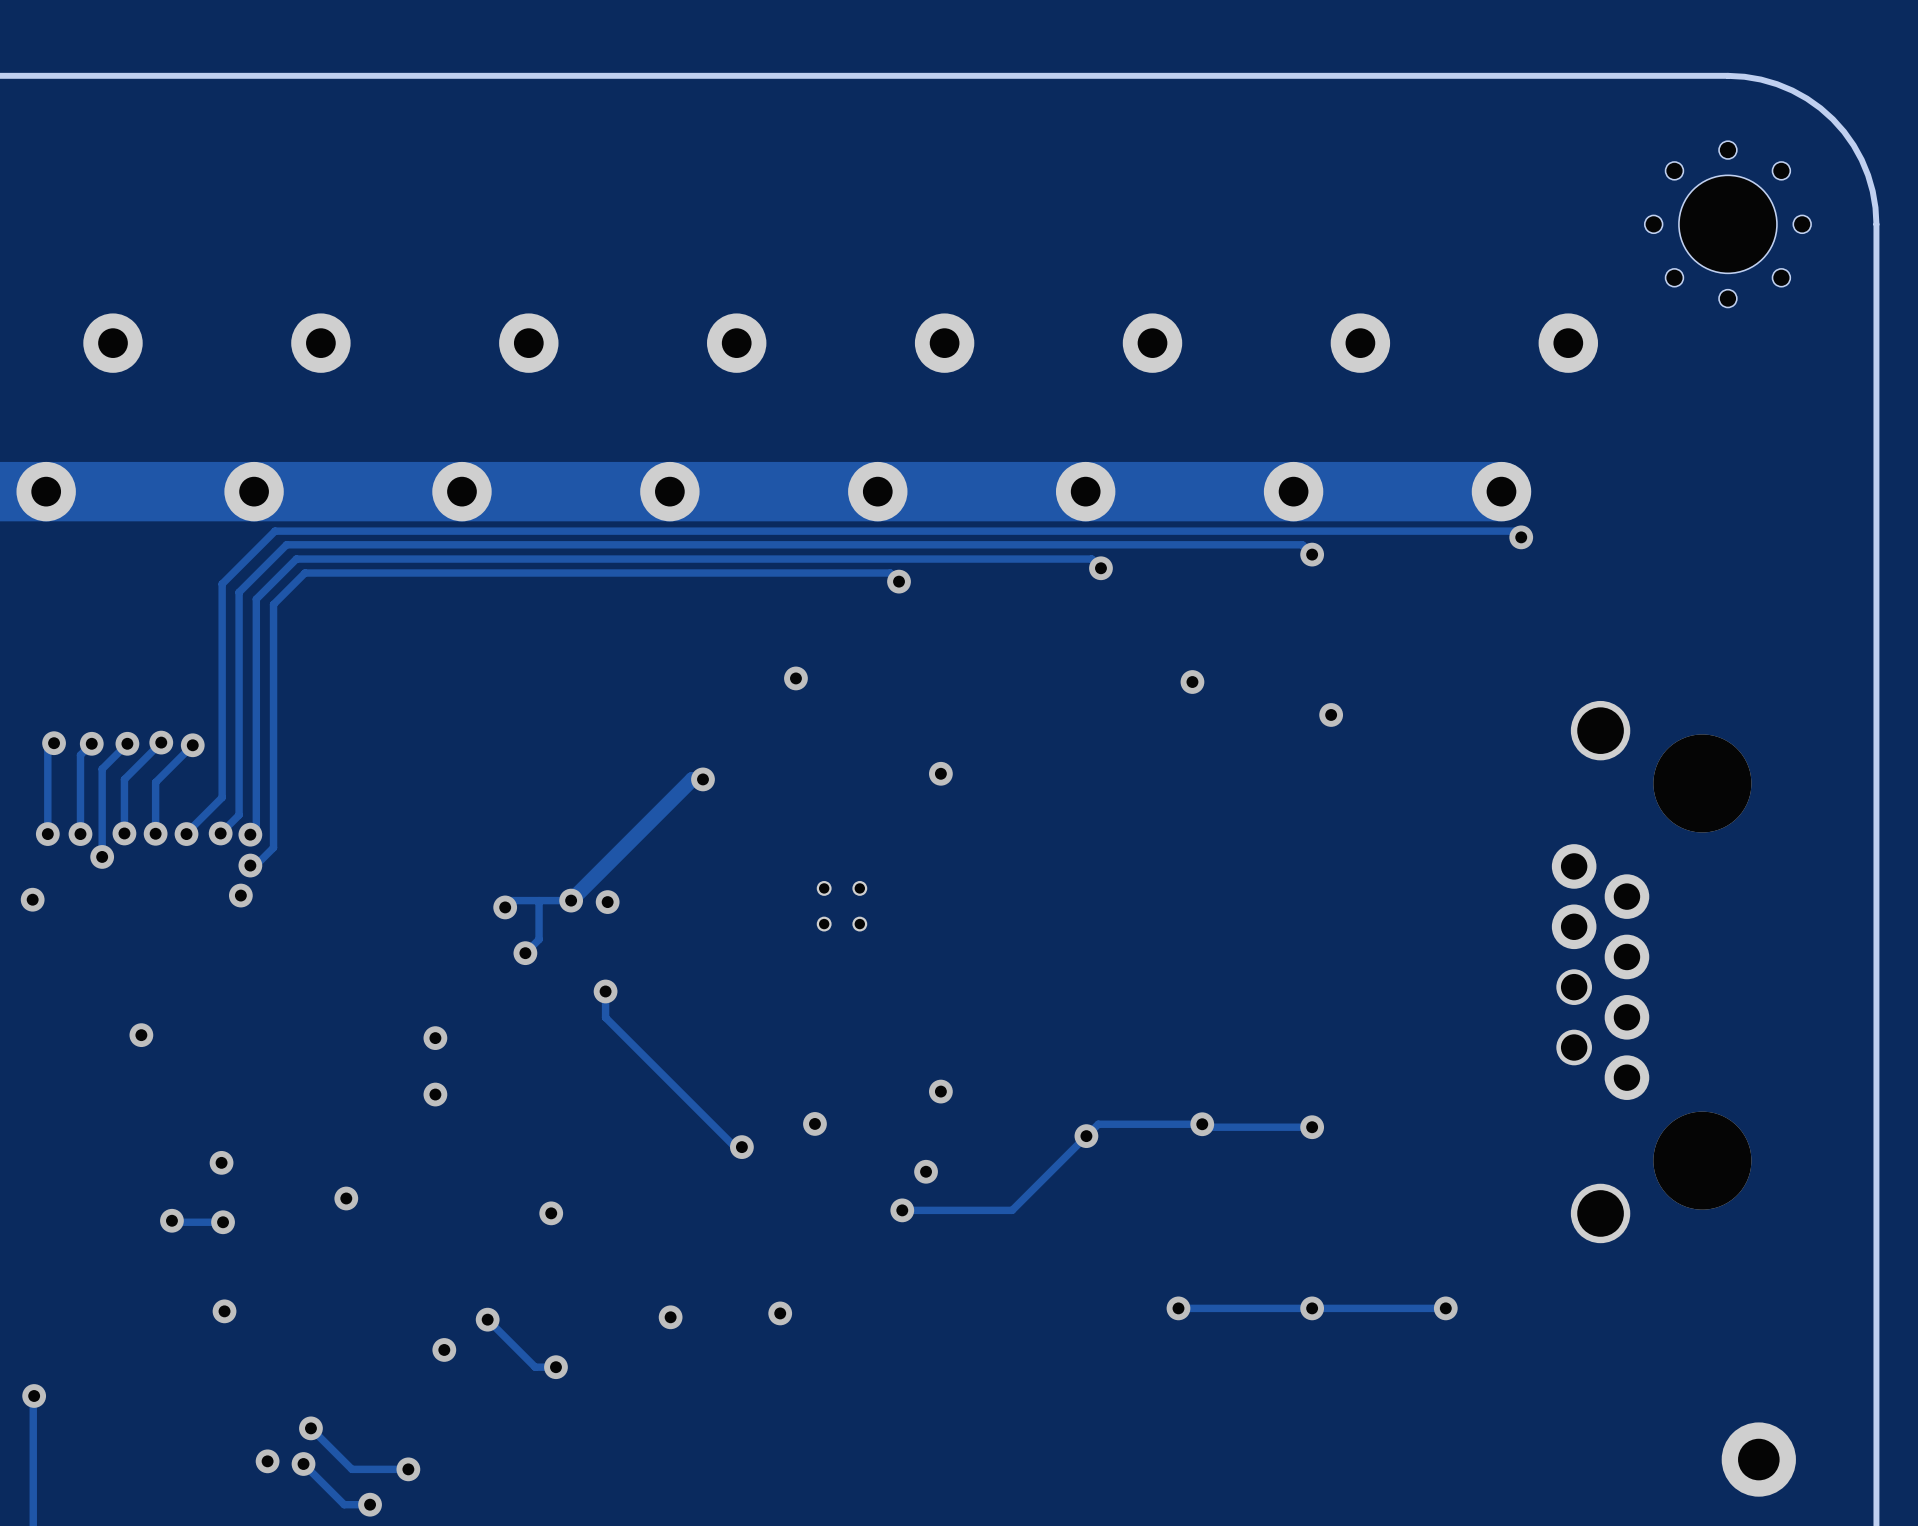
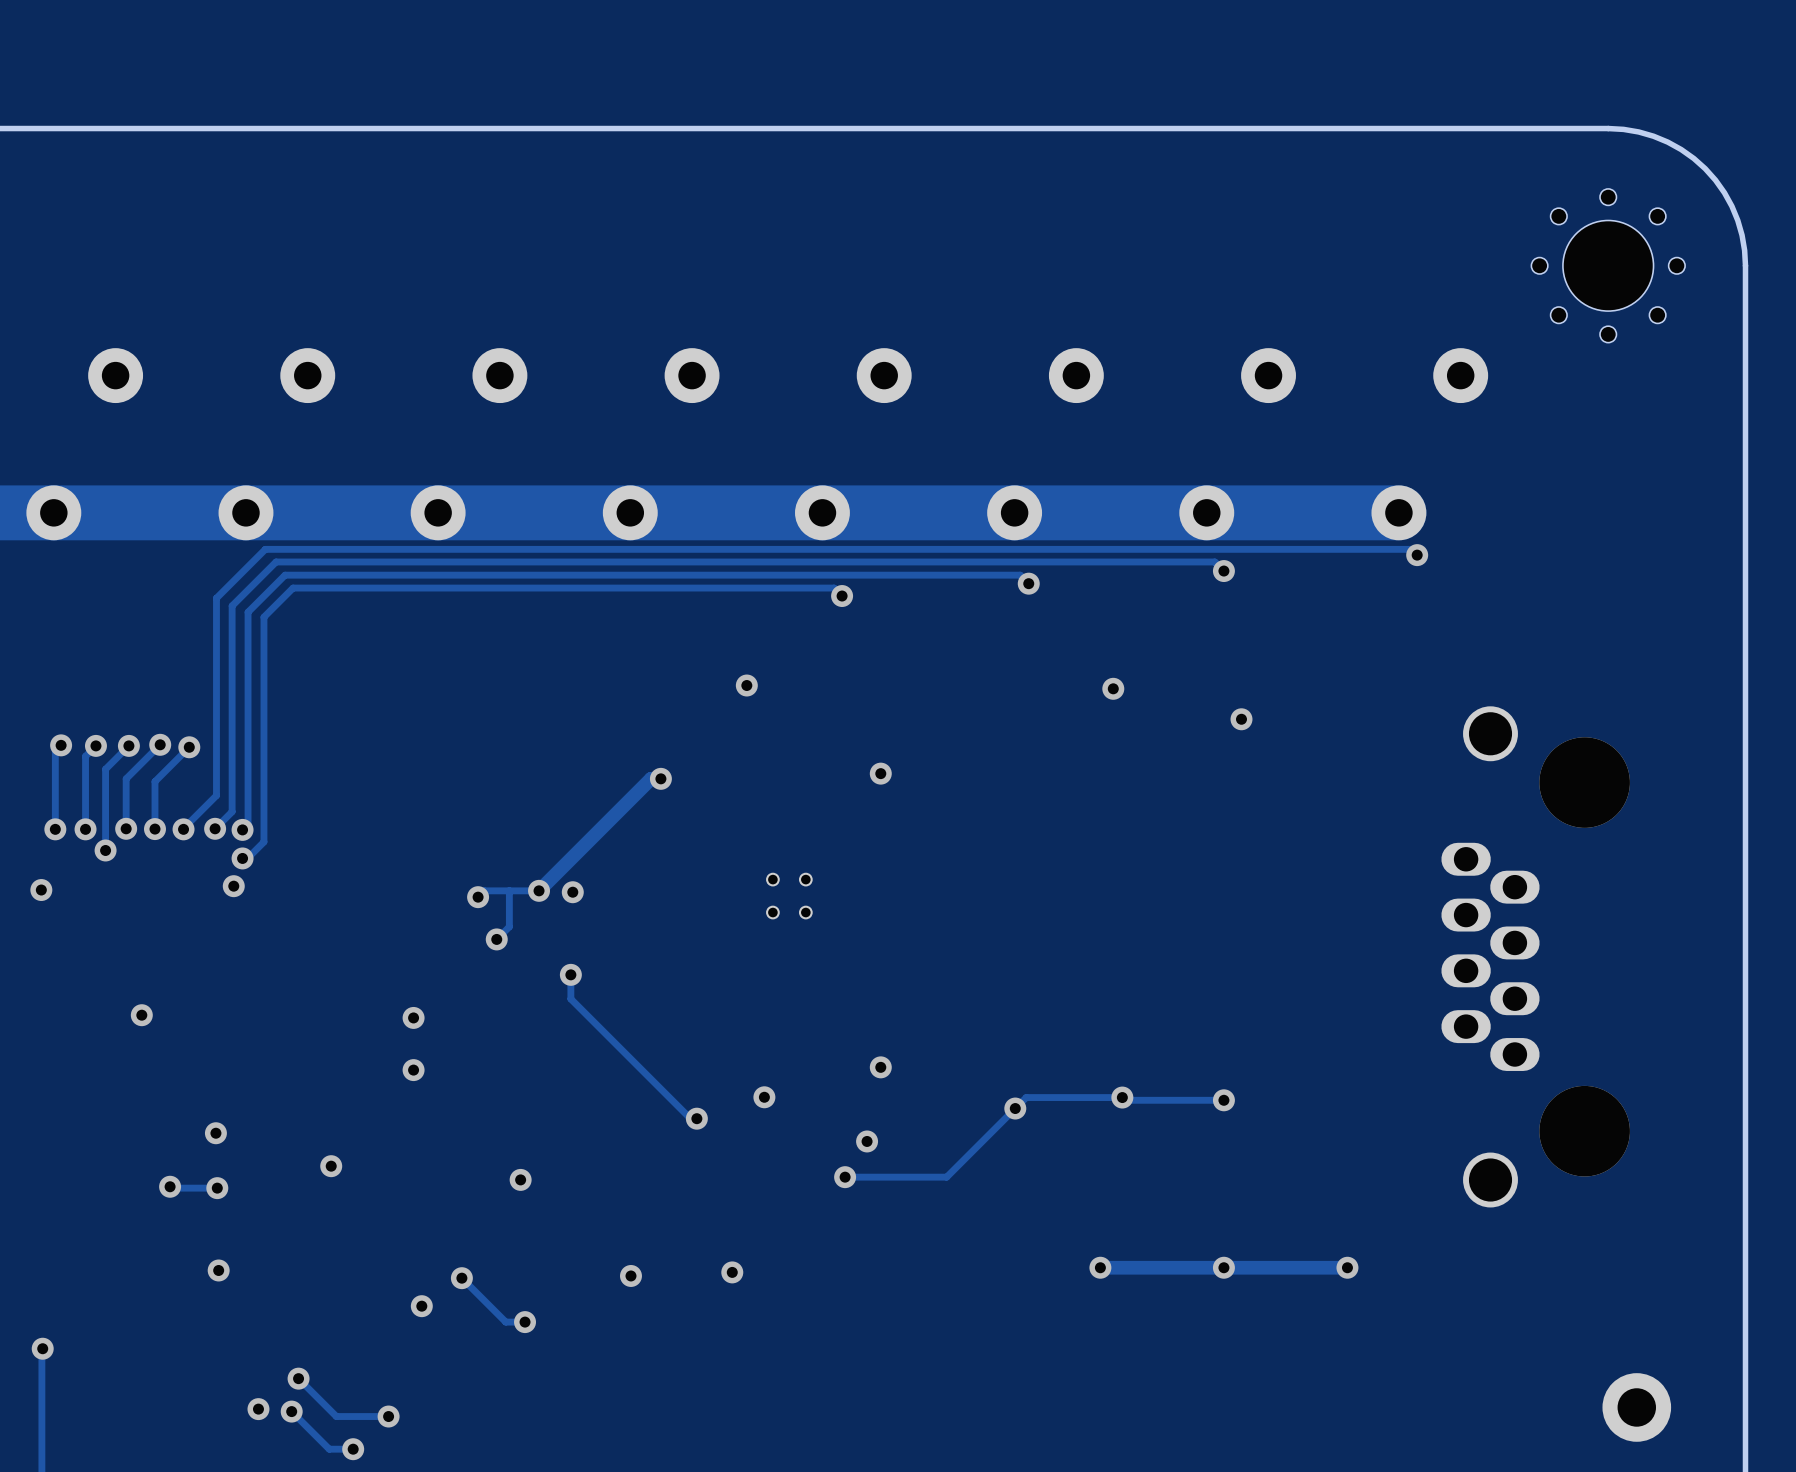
part footprint: [1551, 700, 1752, 1244] -> [1441, 706, 1630, 1208]
track width: thin (1445, 1308) (1178, 1308) -> thick (1347, 1267) (1100, 1267)

